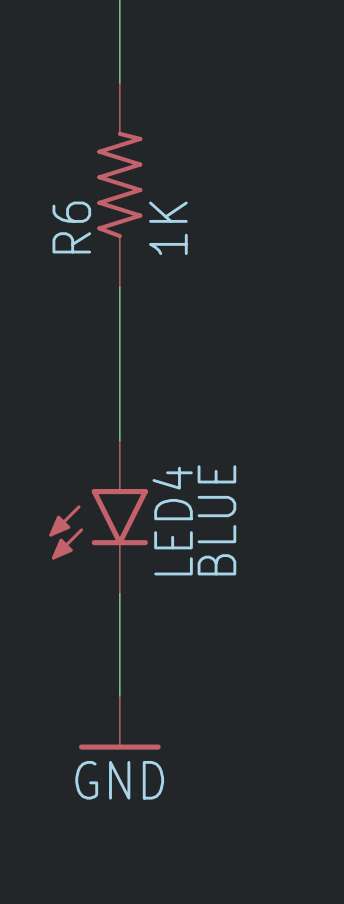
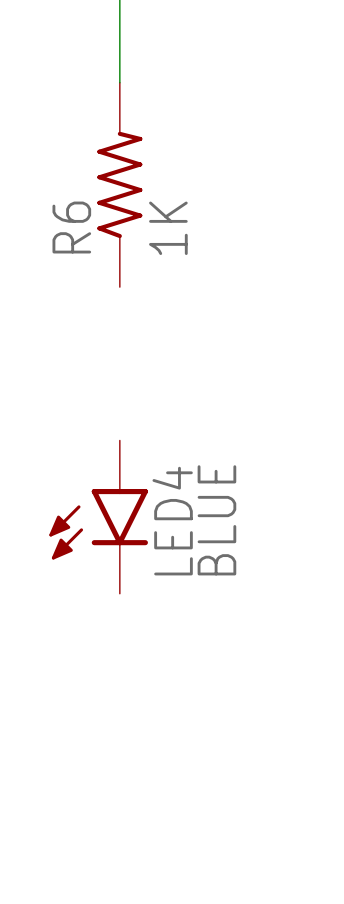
wire: (119, 287) (119, 440) -> none
wire: (119, 593) (119, 695) -> none
power symbol: GND (119, 722) -> none

